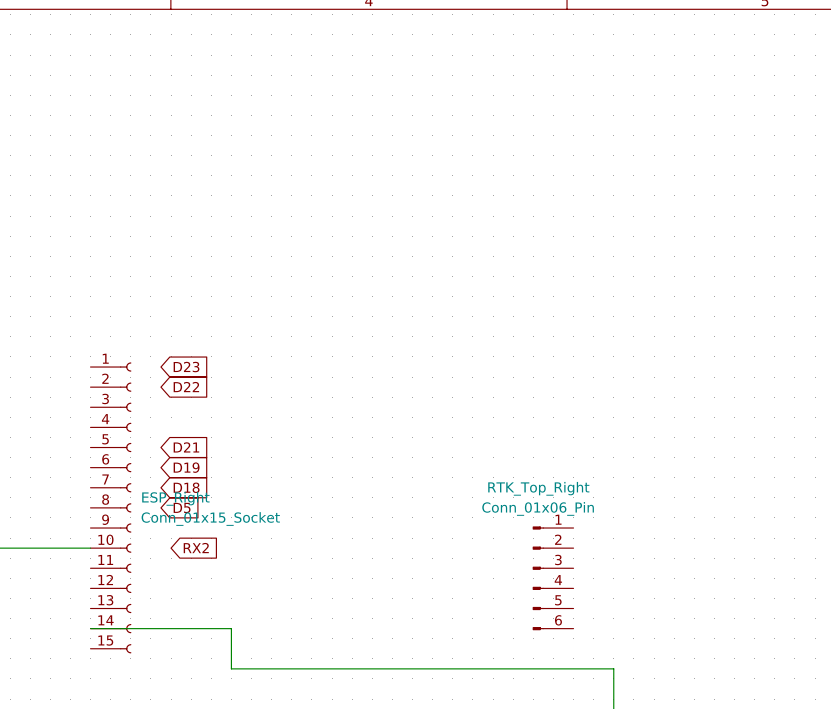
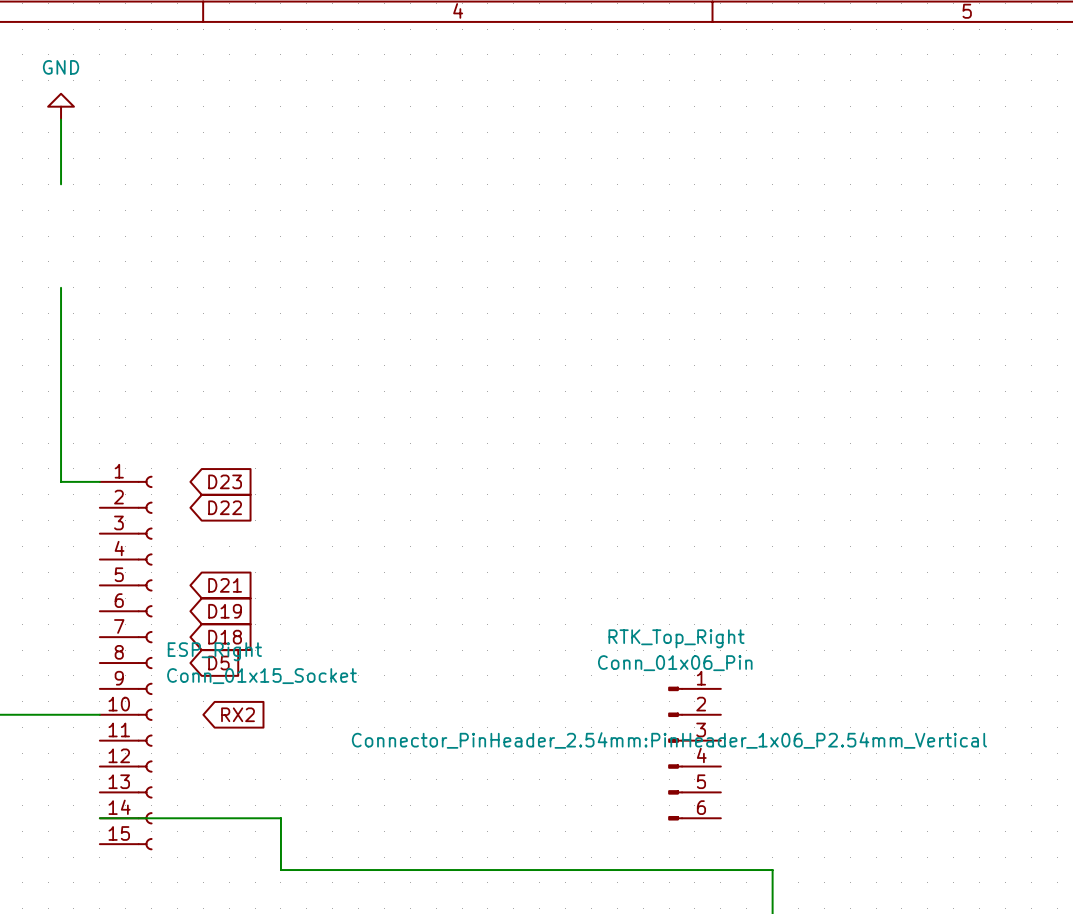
power symbol: none -> GND (61, 106)
wire: none -> (61, 119) (61, 184)
wire: none -> (61, 287) (61, 481) (99, 481)
RTK_Top_Right text: none -> Connector_PinHeader_2.54mm:PinHeader_1x06_P2.54mm_Vertical (669, 740)

